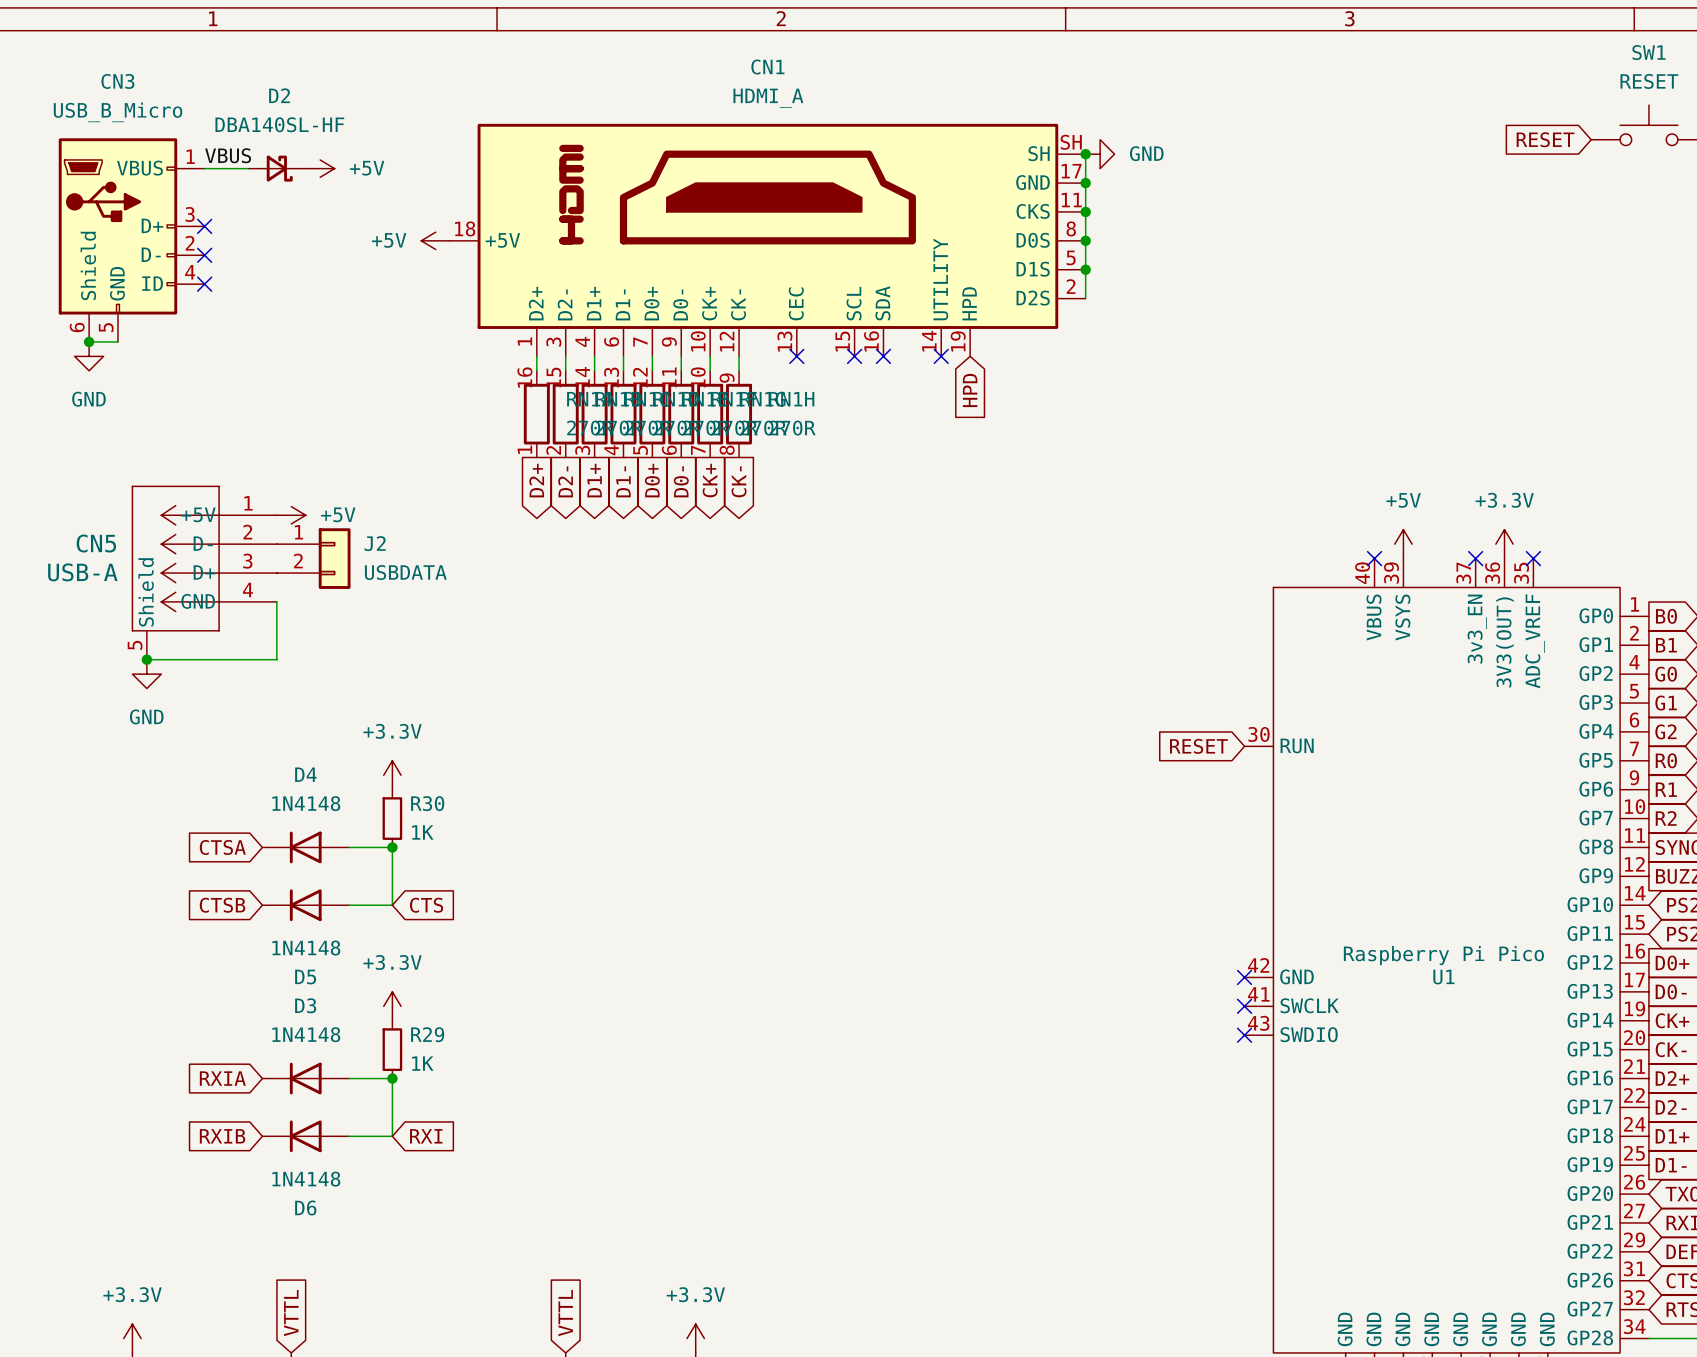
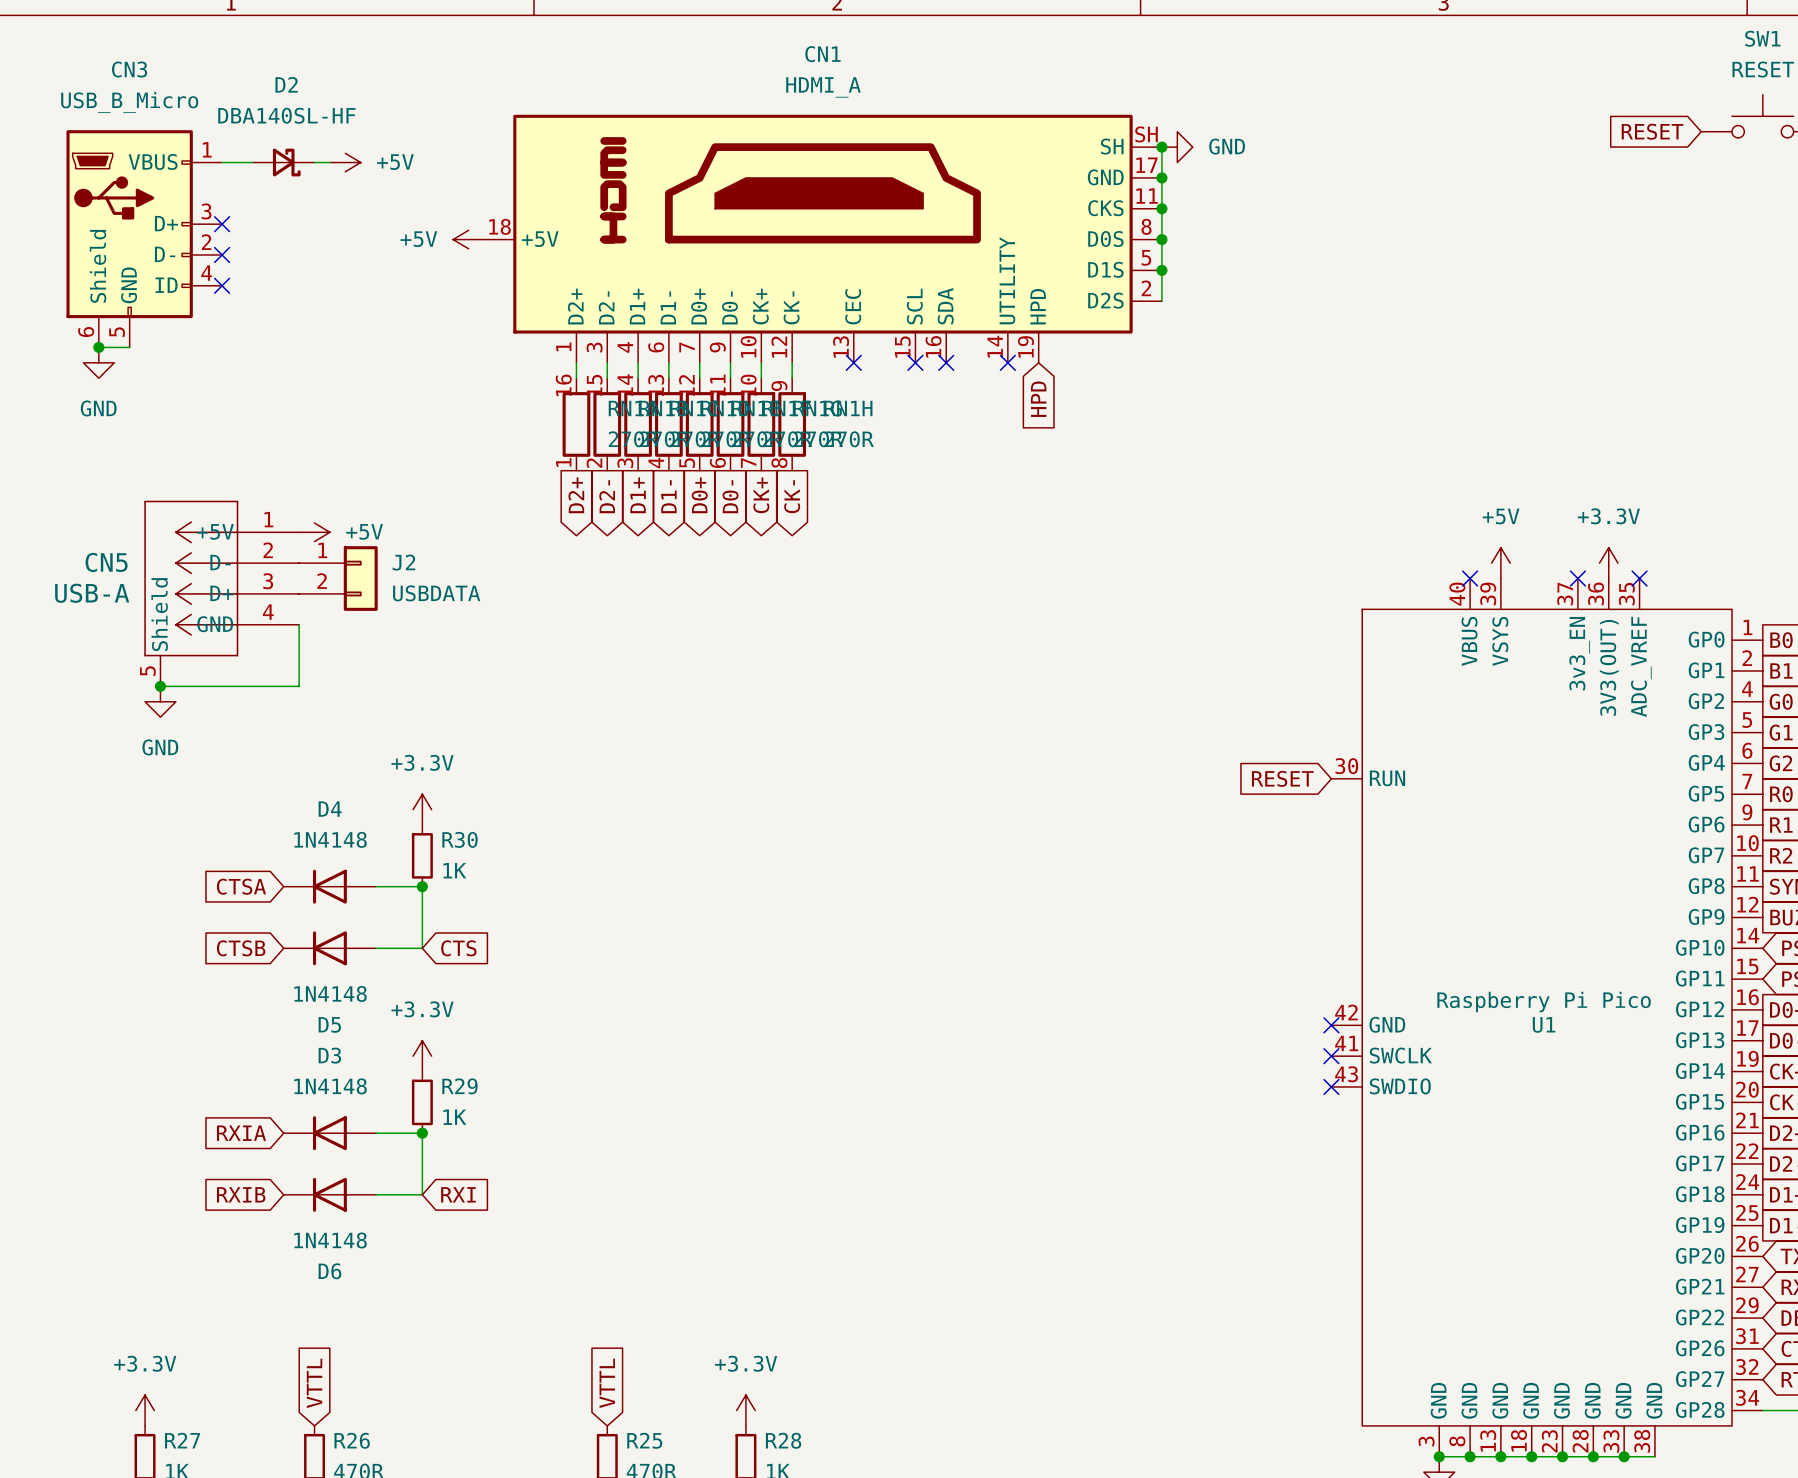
label: VBUS (228, 155) -> none
D2 position: (276, 168) -> (283, 162)

